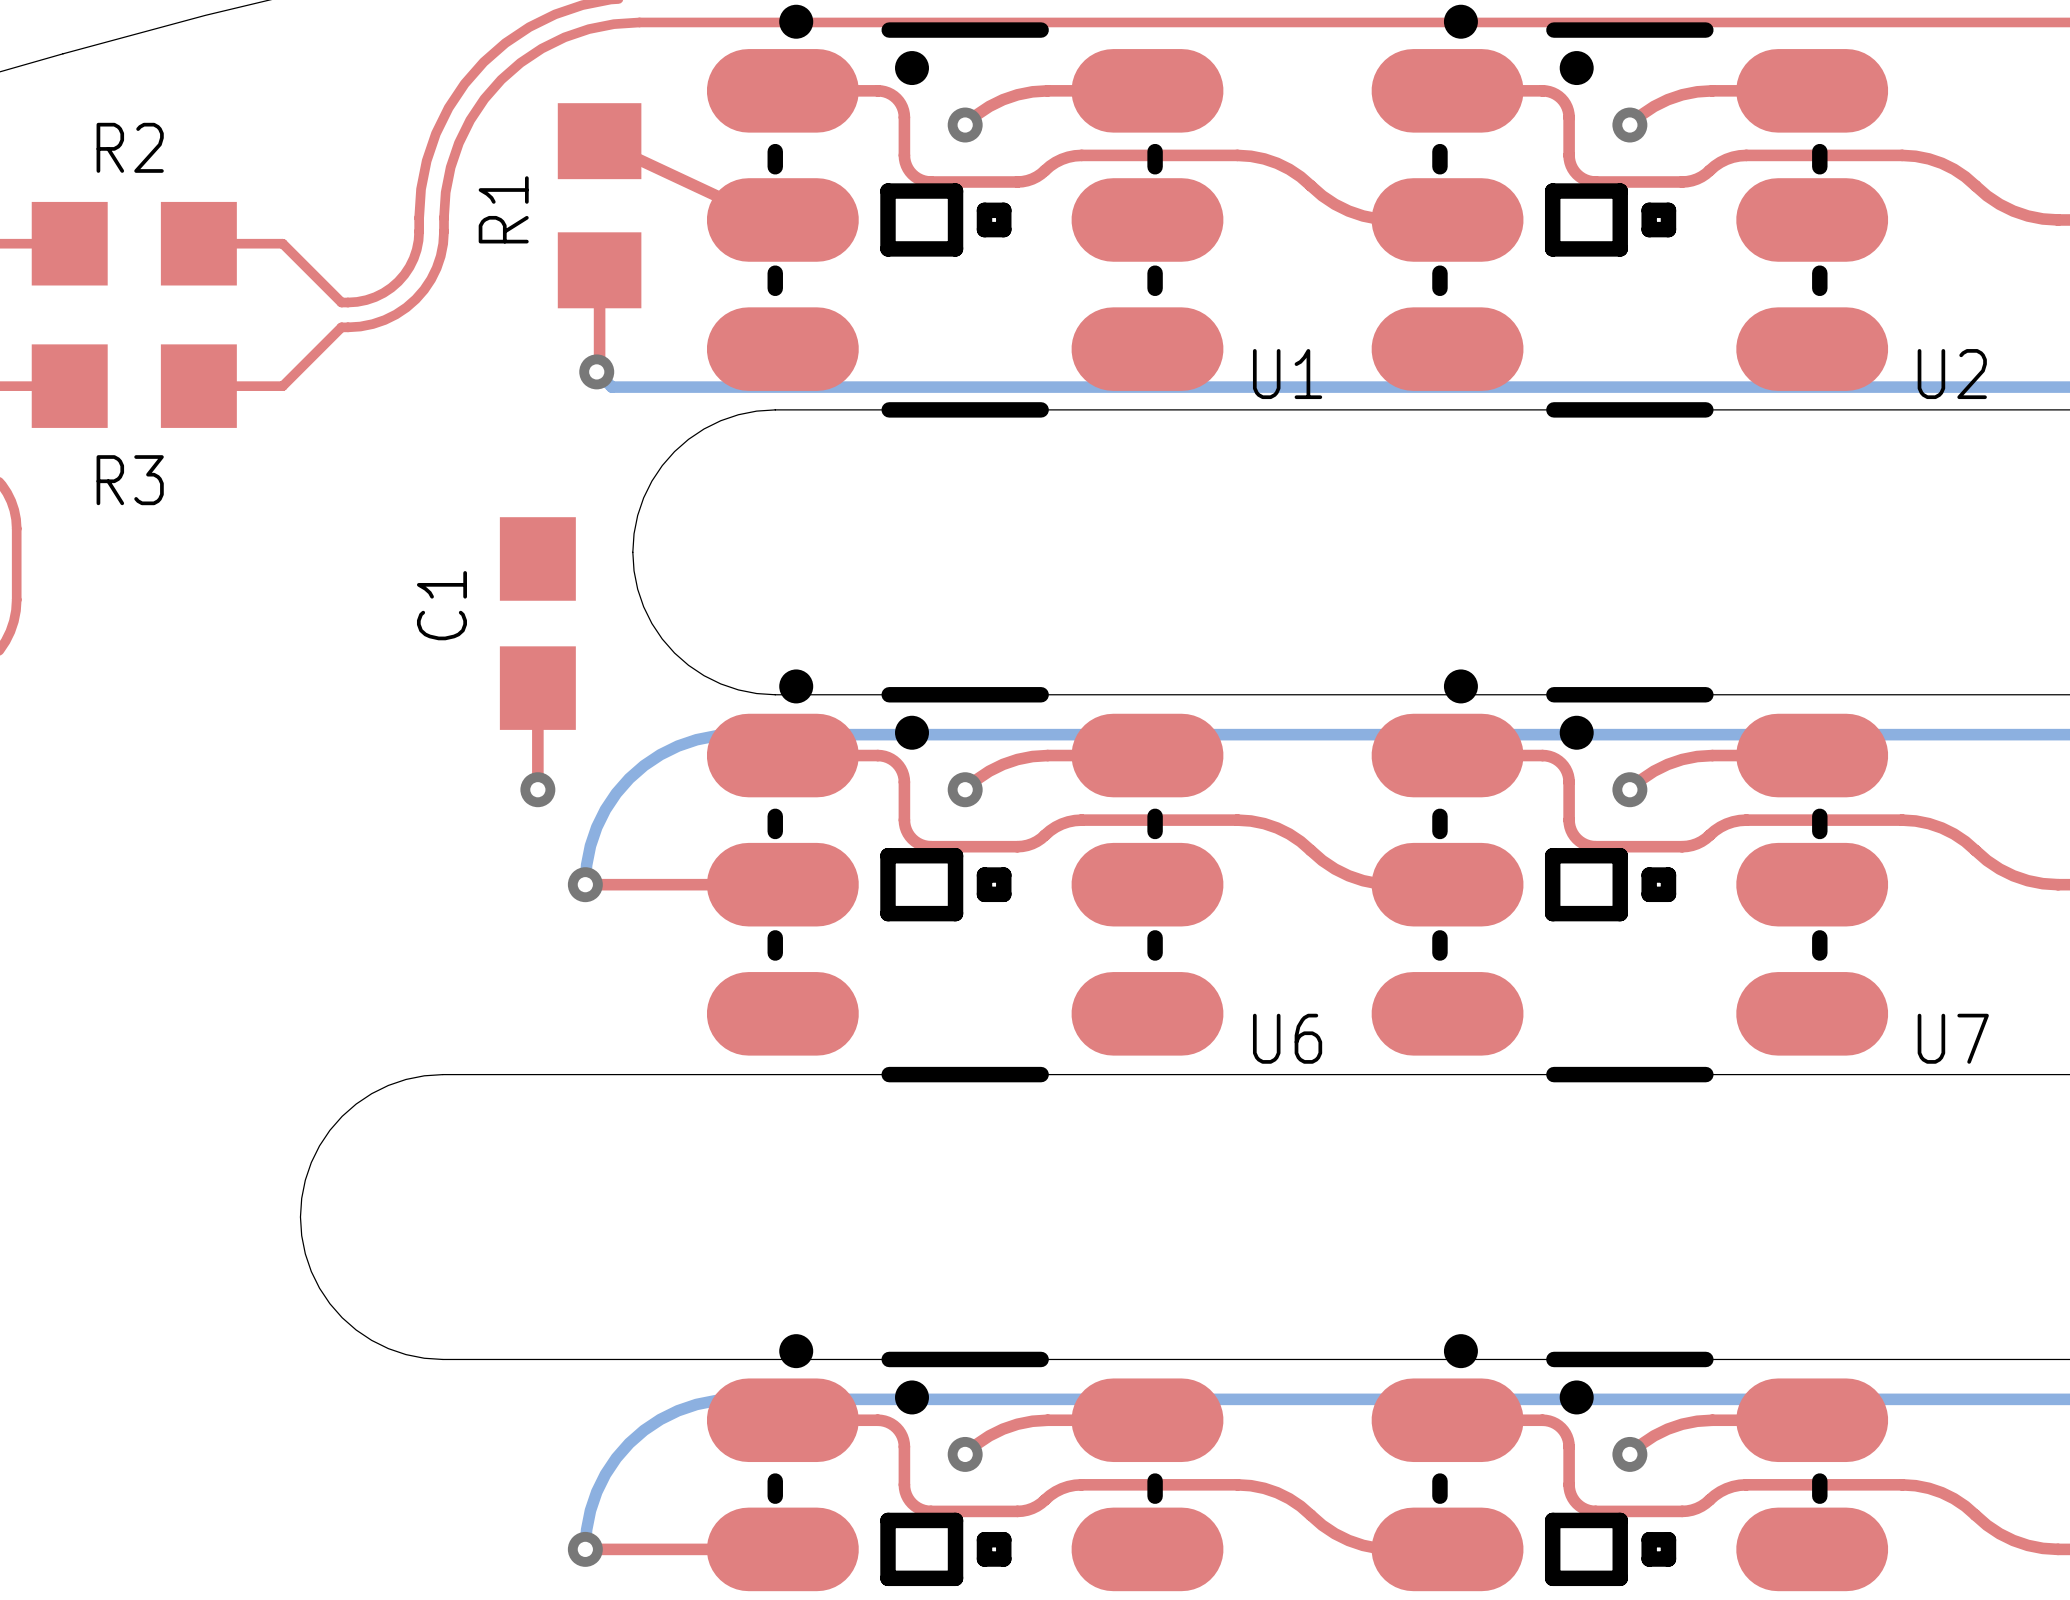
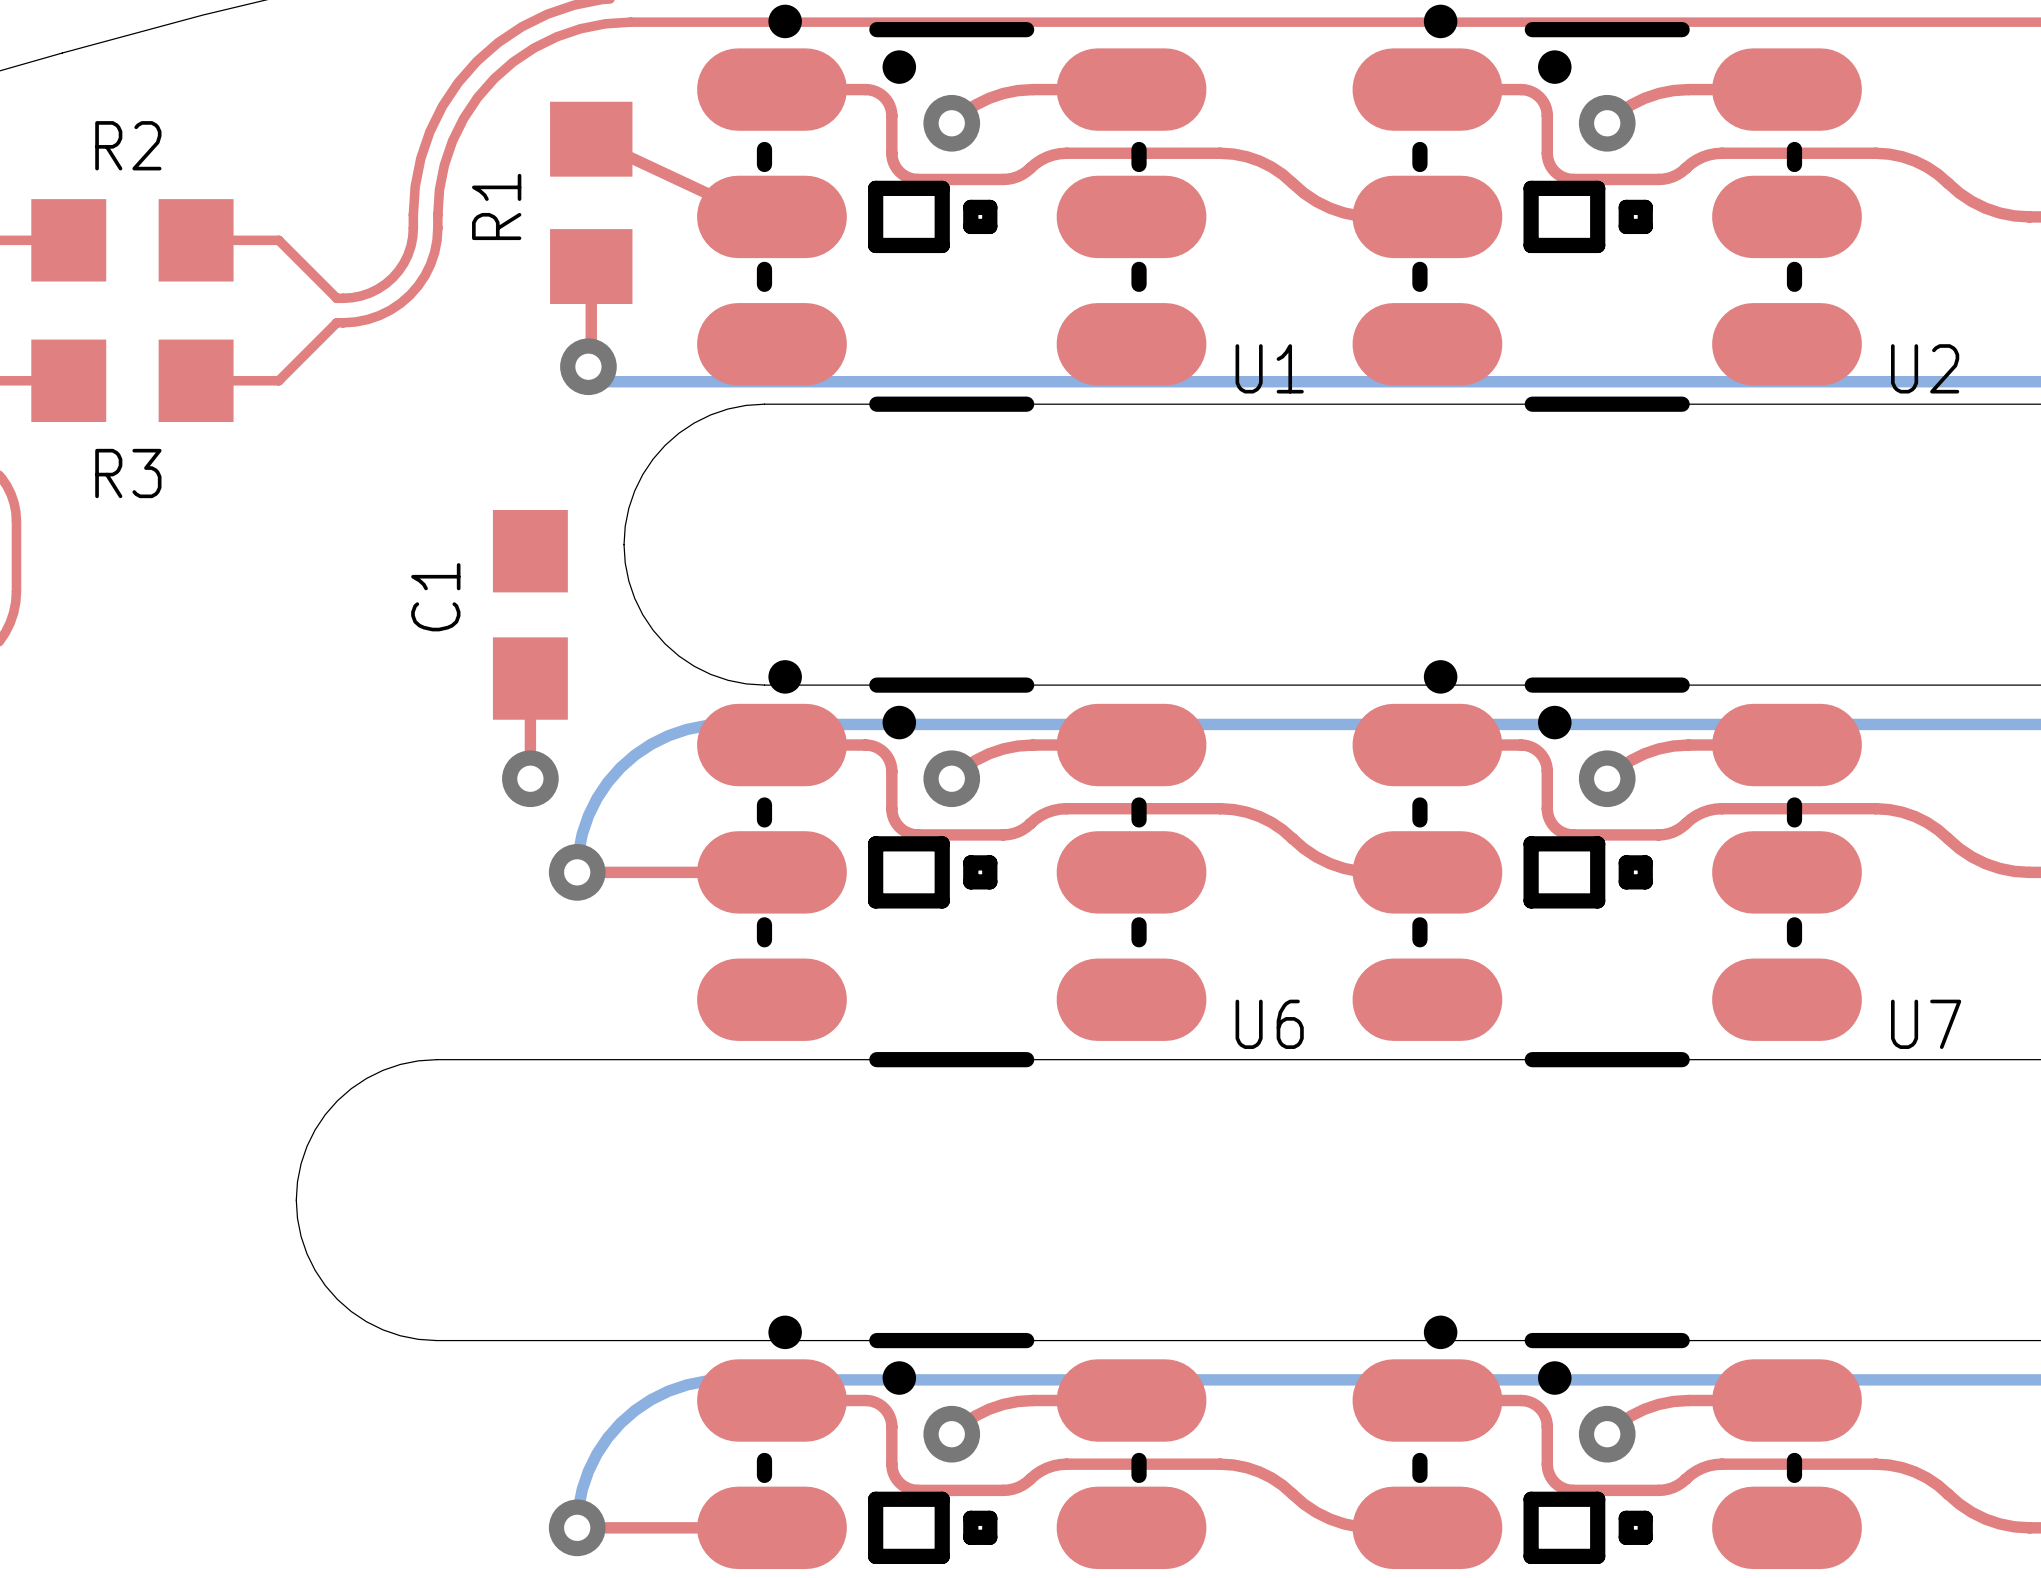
via size: [947, 107, 983, 143] -> [923, 94, 981, 152]
via size: [1612, 107, 1648, 143] -> [1578, 94, 1636, 152]
via size: [579, 354, 615, 390] -> [560, 338, 617, 396]
via size: [520, 772, 556, 808] -> [502, 750, 559, 808]
via size: [947, 772, 983, 808] -> [923, 750, 981, 808]
via size: [1612, 772, 1648, 808] -> [1578, 750, 1636, 808]
via size: [567, 867, 603, 903] -> [548, 844, 606, 901]
via size: [947, 1436, 983, 1472] -> [923, 1405, 981, 1463]
via size: [1612, 1436, 1648, 1472] -> [1578, 1405, 1636, 1463]
via size: [567, 1531, 603, 1567] -> [548, 1499, 606, 1557]

